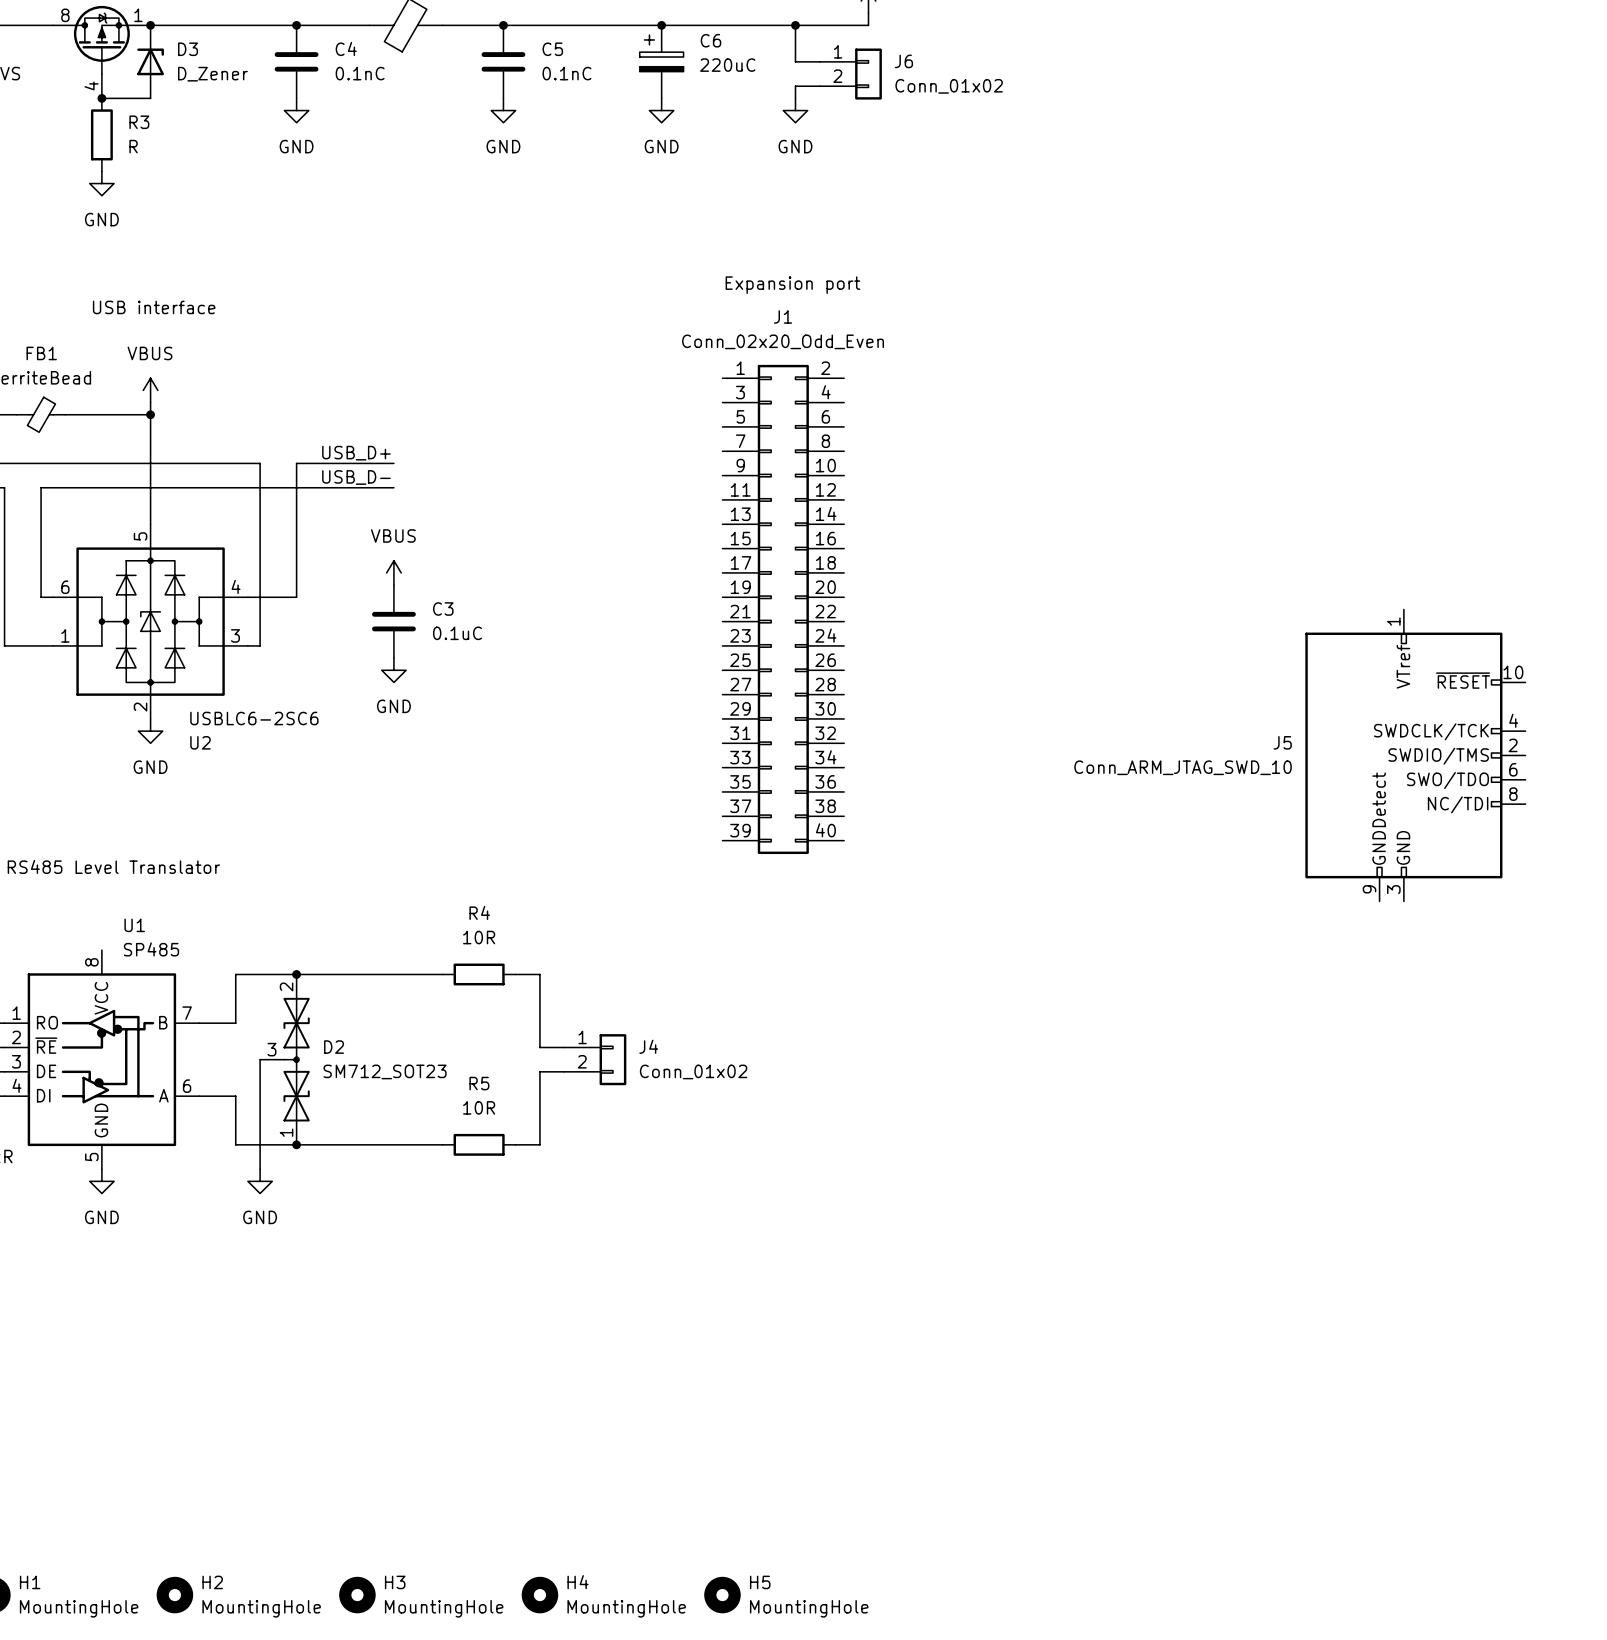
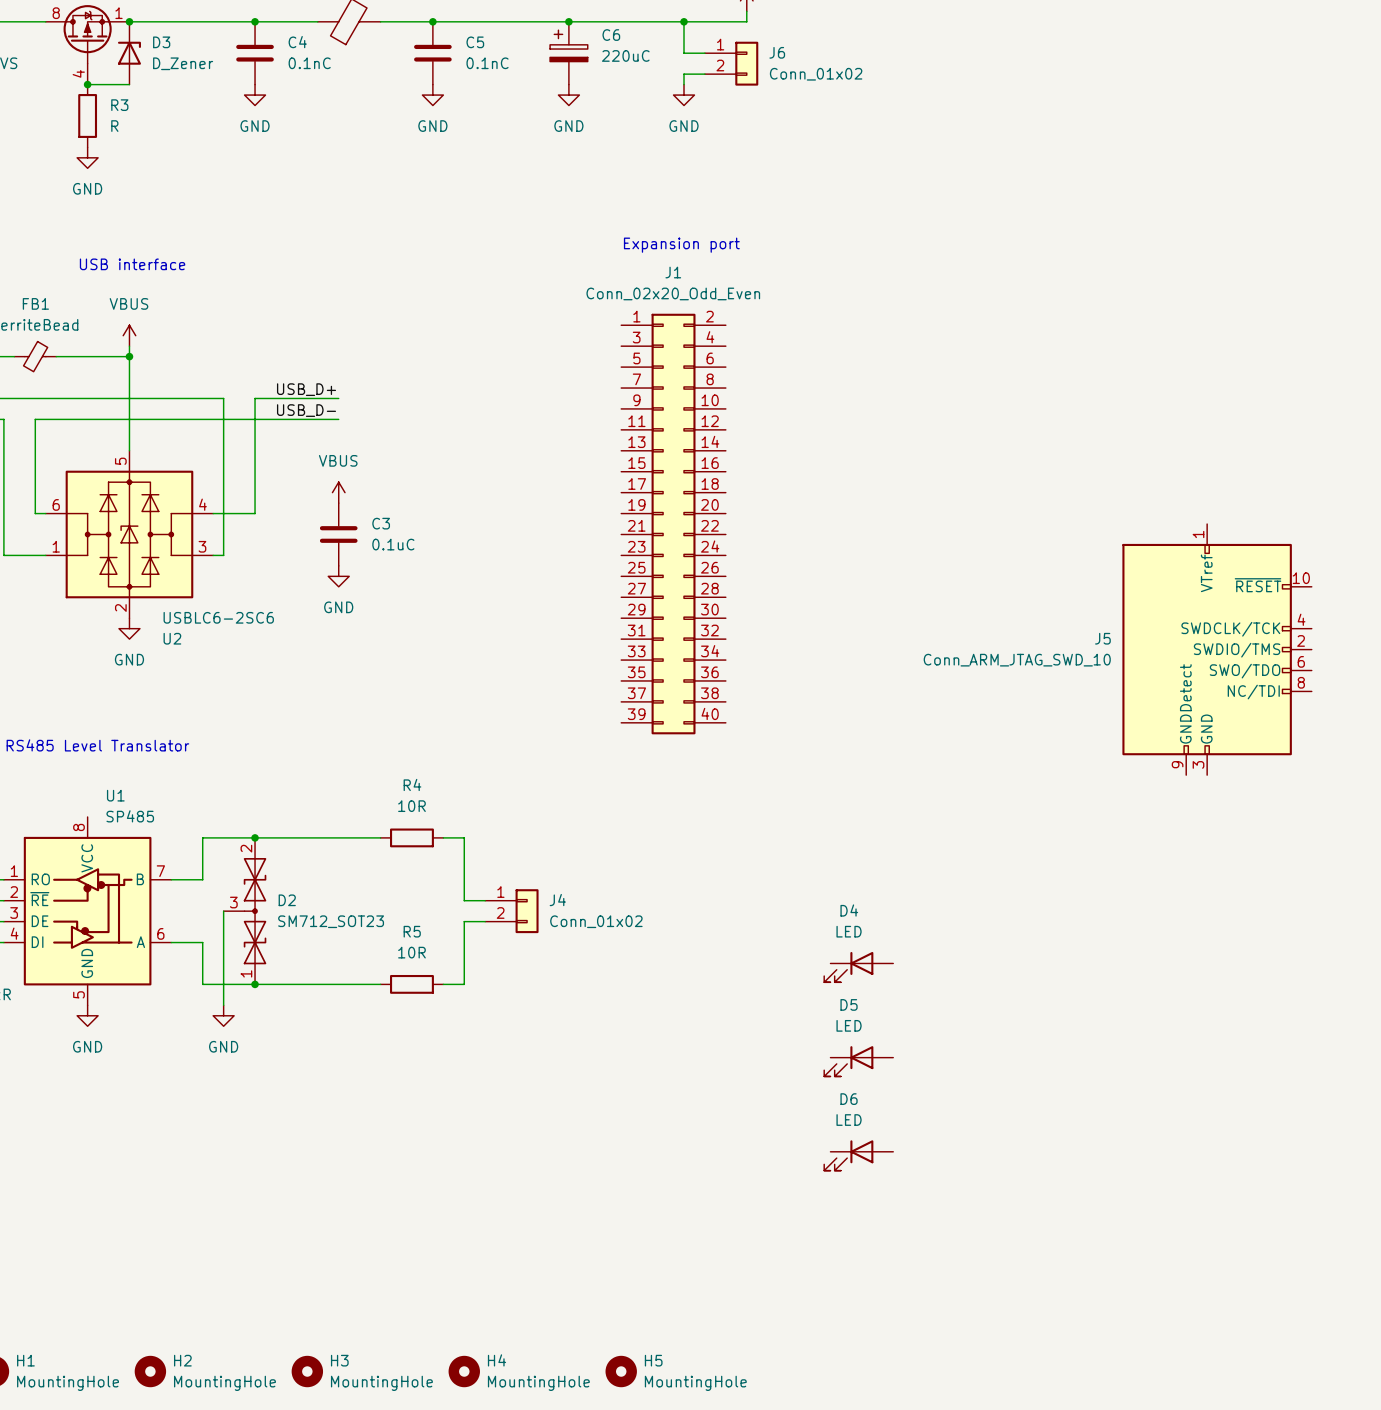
D4: none -> LED (858, 967)
D5: none -> LED (858, 1061)
D6: none -> LED (858, 1155)

